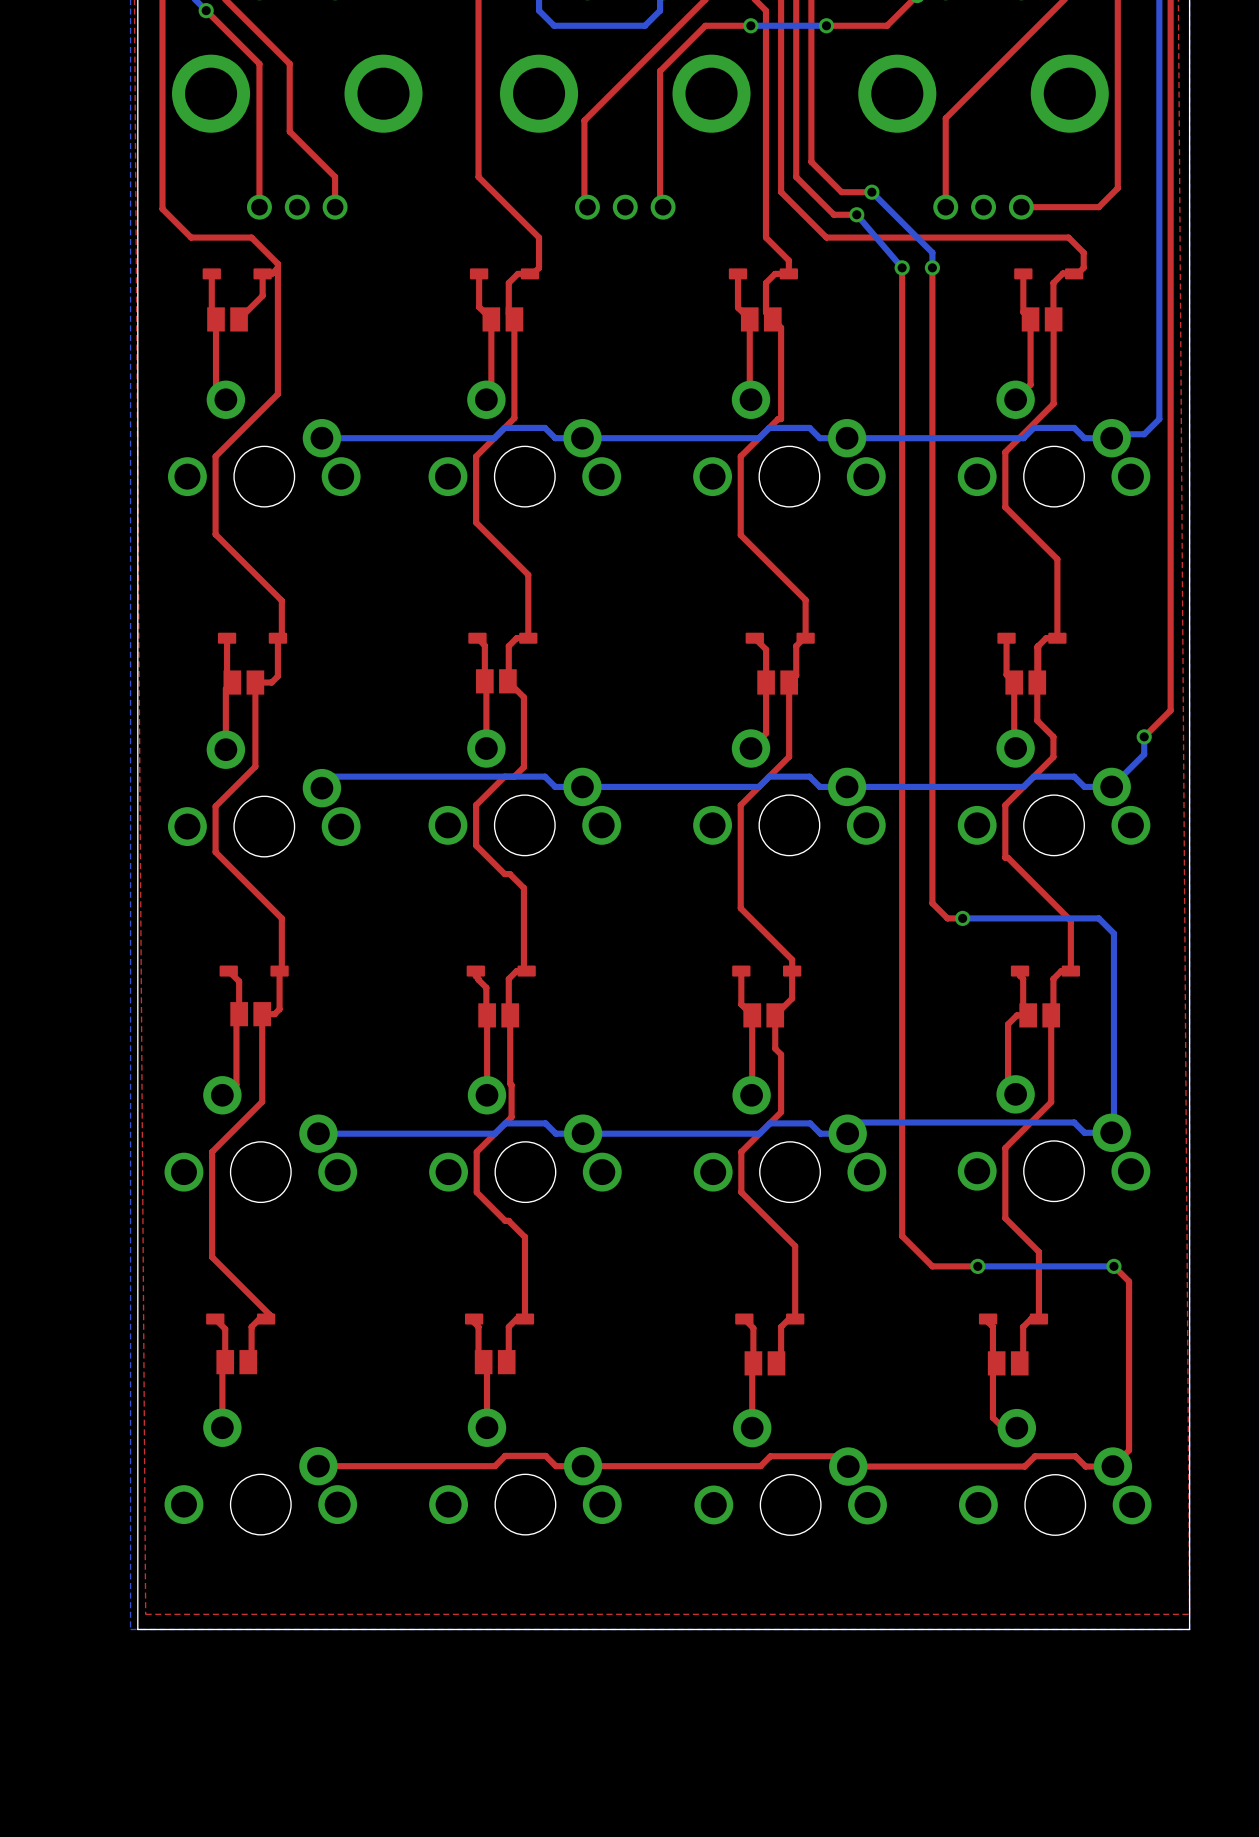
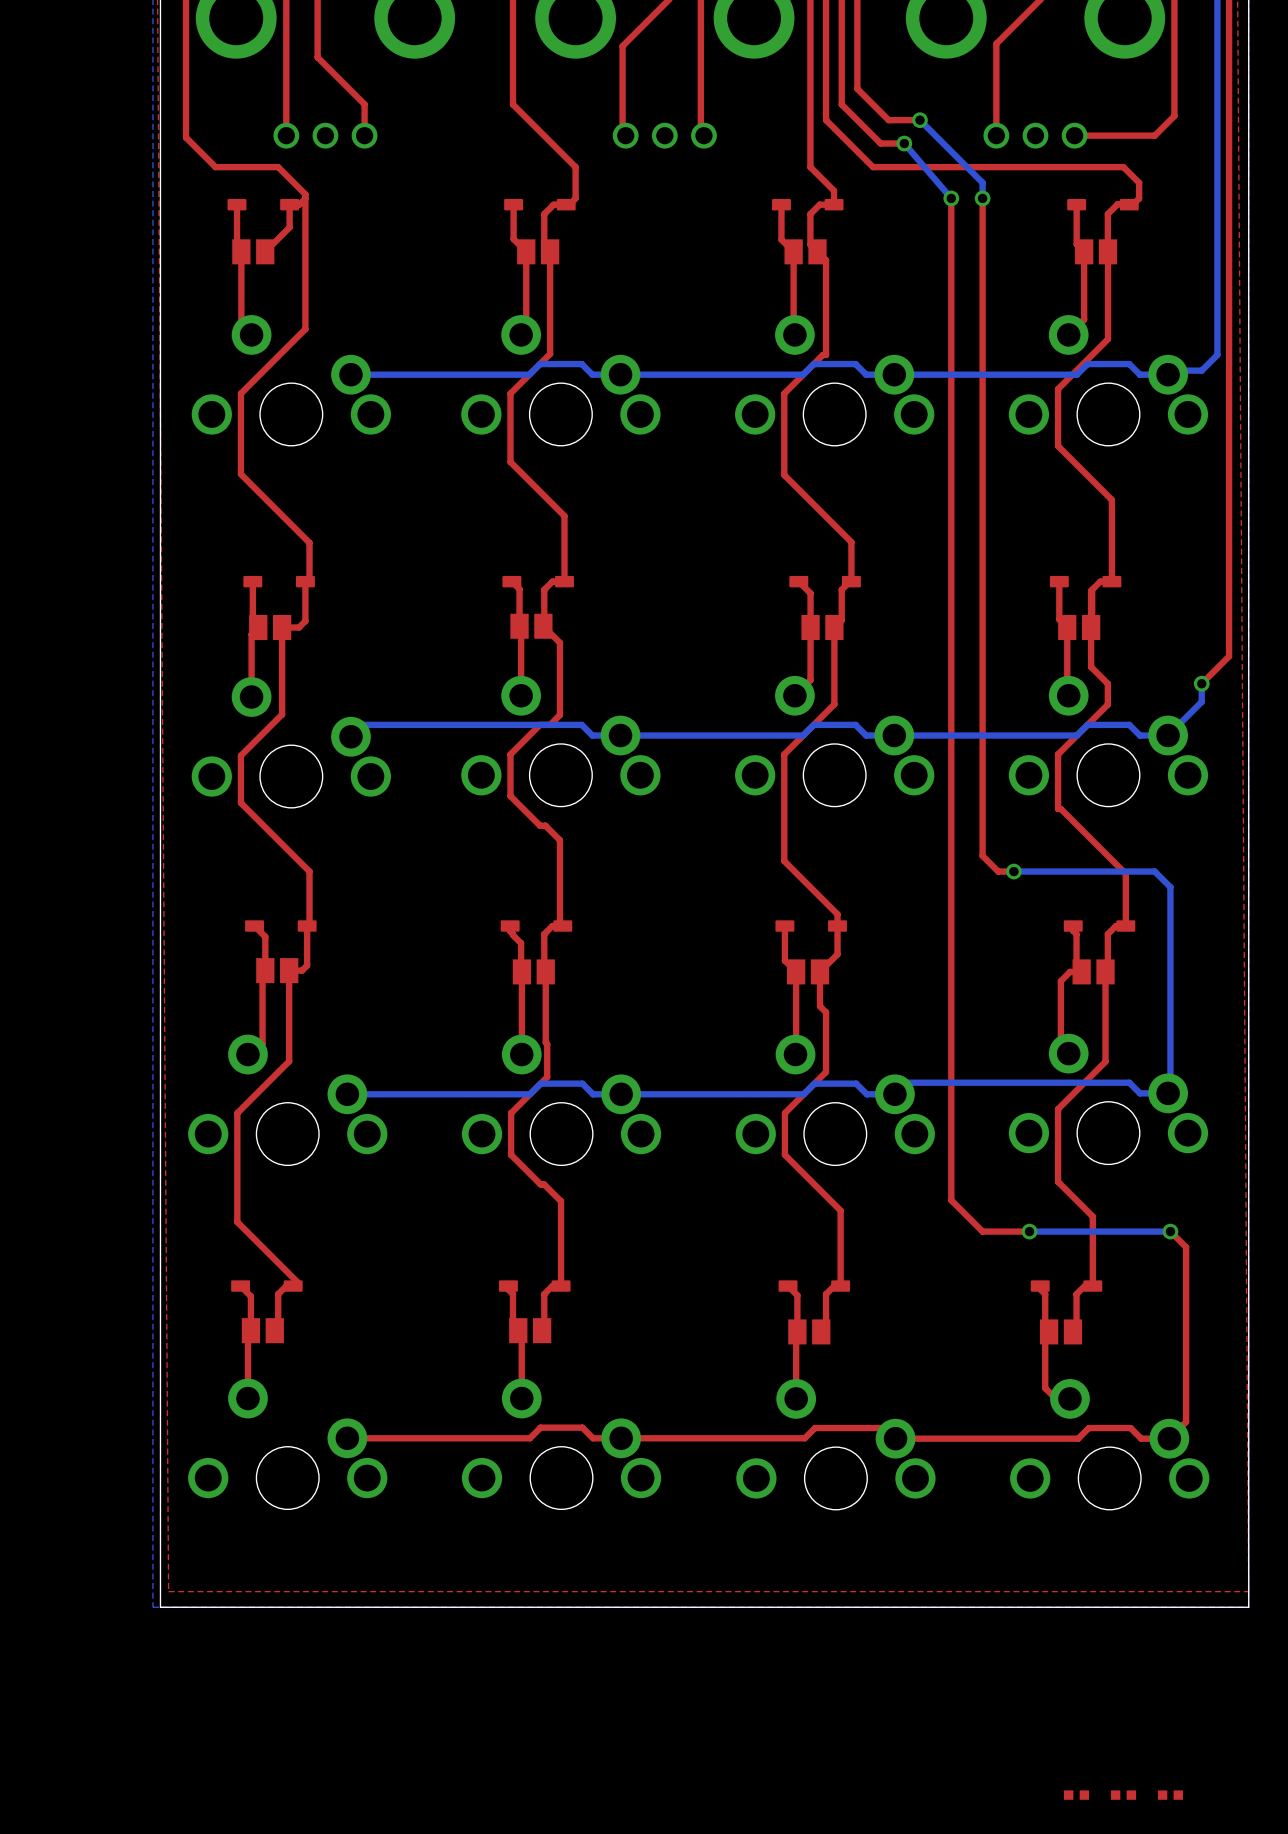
part: none -> (1076, 1795)
part: none -> (1123, 1795)
part: none -> (1170, 1795)

